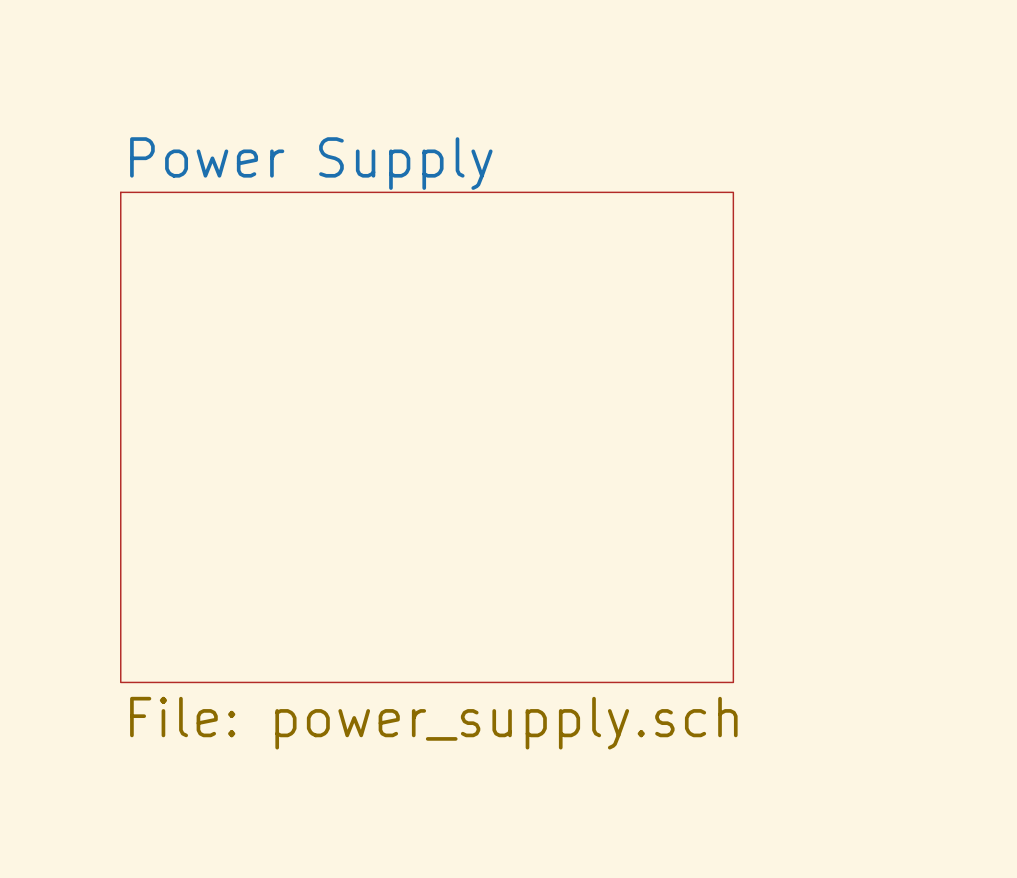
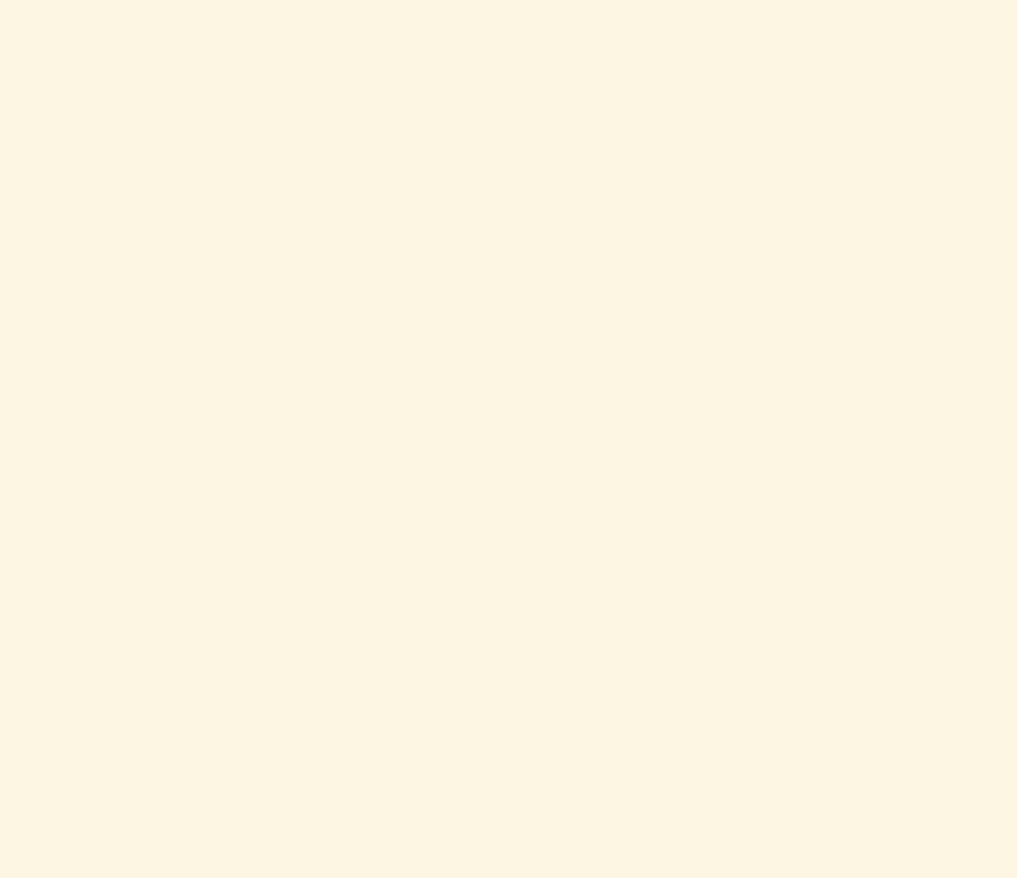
sheet Power Supply: File: power_supply.sch (427, 437) -> none

